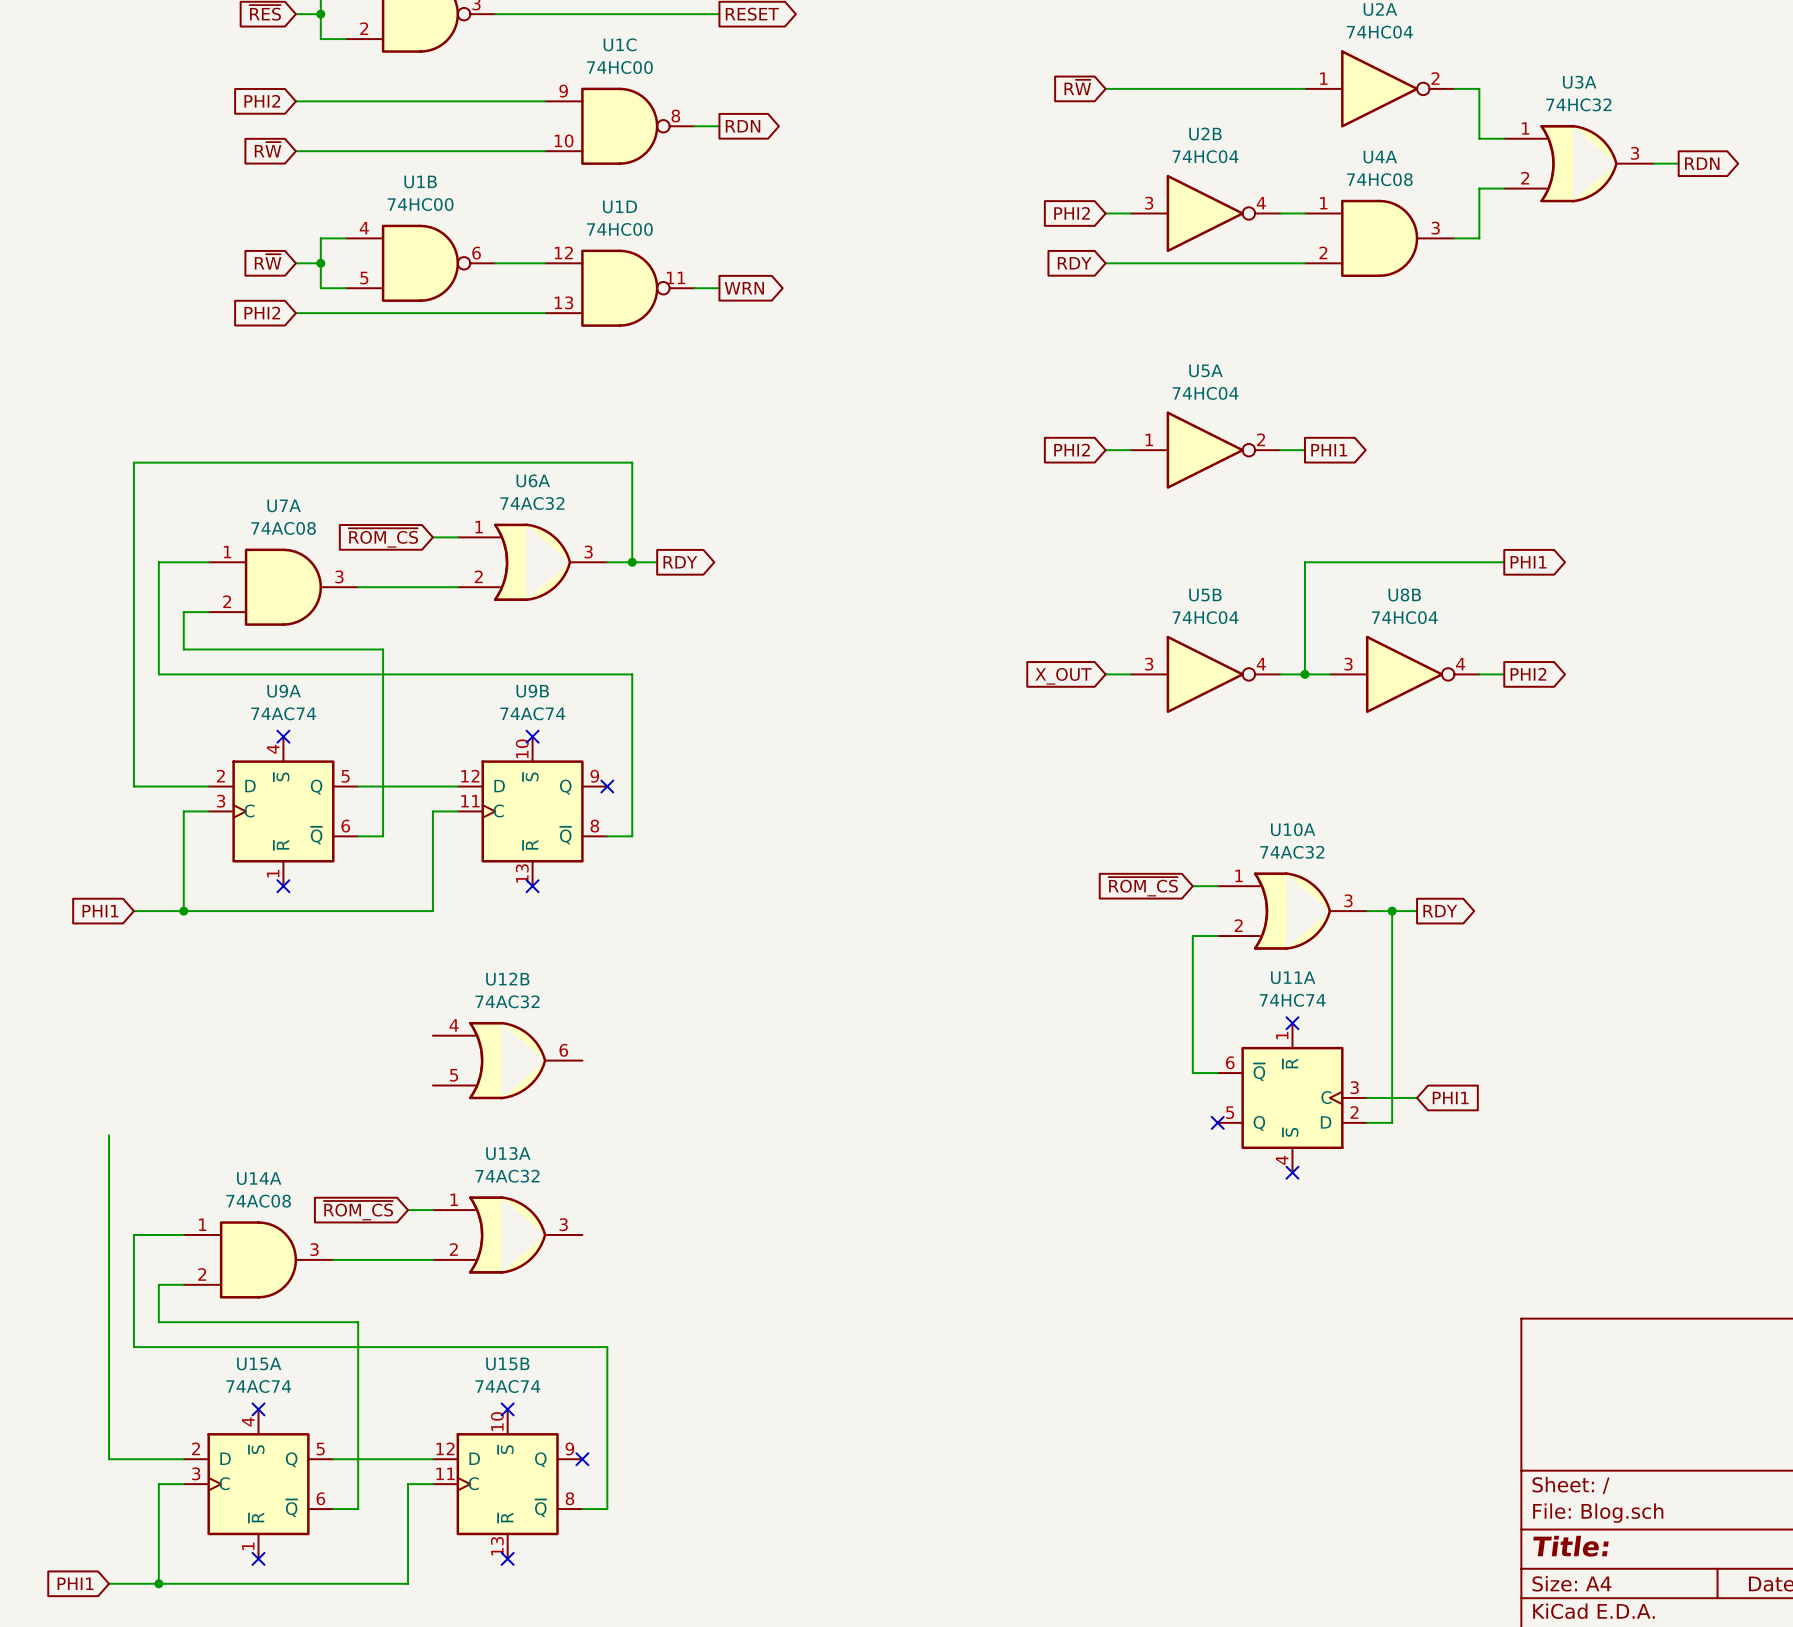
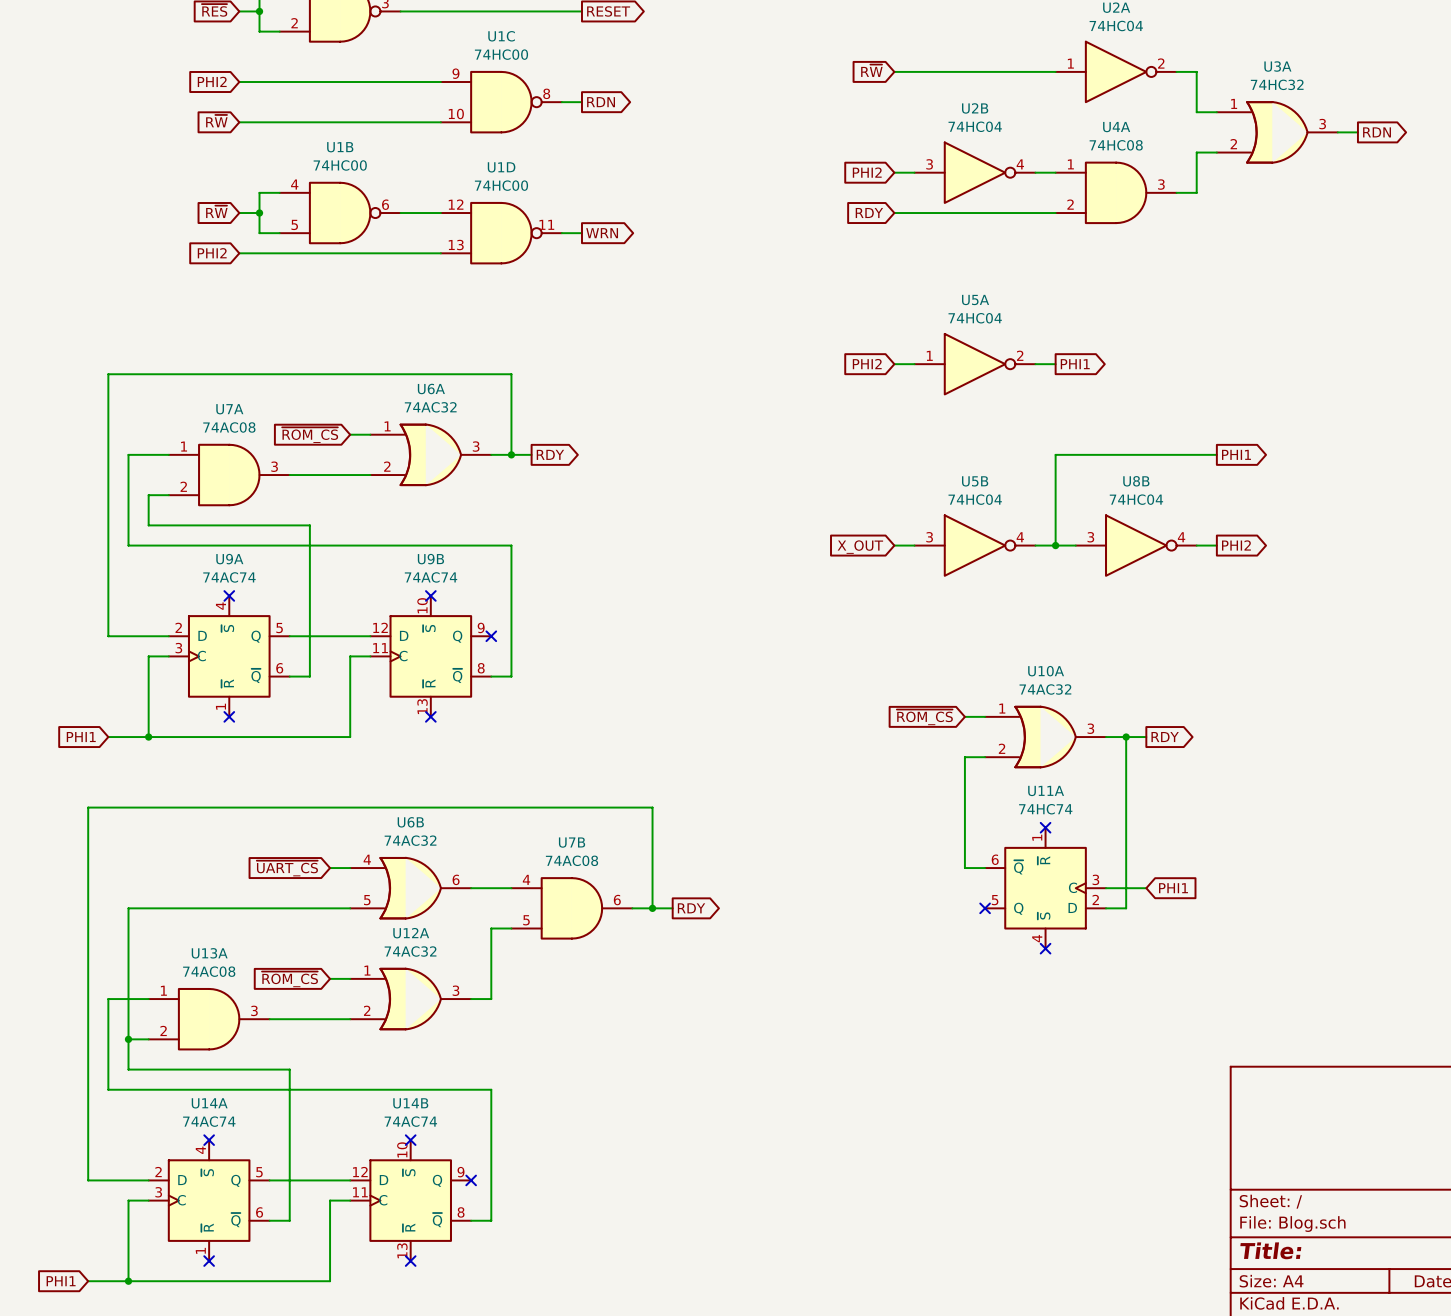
U12B: 74AC32 (507, 1060) -> none
global label: none -> ~{UART_CS} (287, 868)
wire: none -> (330, 868) (350, 868)
U6B: none -> 74AC32 (410, 888)
wire: none -> (471, 888) (511, 888)
wire: none -> (350, 908) (128, 908) (128, 1039)
U7B: none -> 74AC08 (571, 908)
wire: none -> (632, 908) (672, 908)
wire: none -> (652, 908) (652, 807) (88, 807) (88, 918)
junction: none -> (652, 908)
global label: none -> RDY (691, 908)
wire: none -> (511, 928) (491, 928) (491, 999) (471, 999)
U13A name: U13A (508, 1153) -> U12A (411, 933)
U14A name: U14A (259, 1178) -> U13A (209, 953)
junction: none -> (128, 1039)
U15A name: U15A (259, 1363) -> U14A (209, 1103)
U15B name: U15B (507, 1363) -> U14B (410, 1103)

